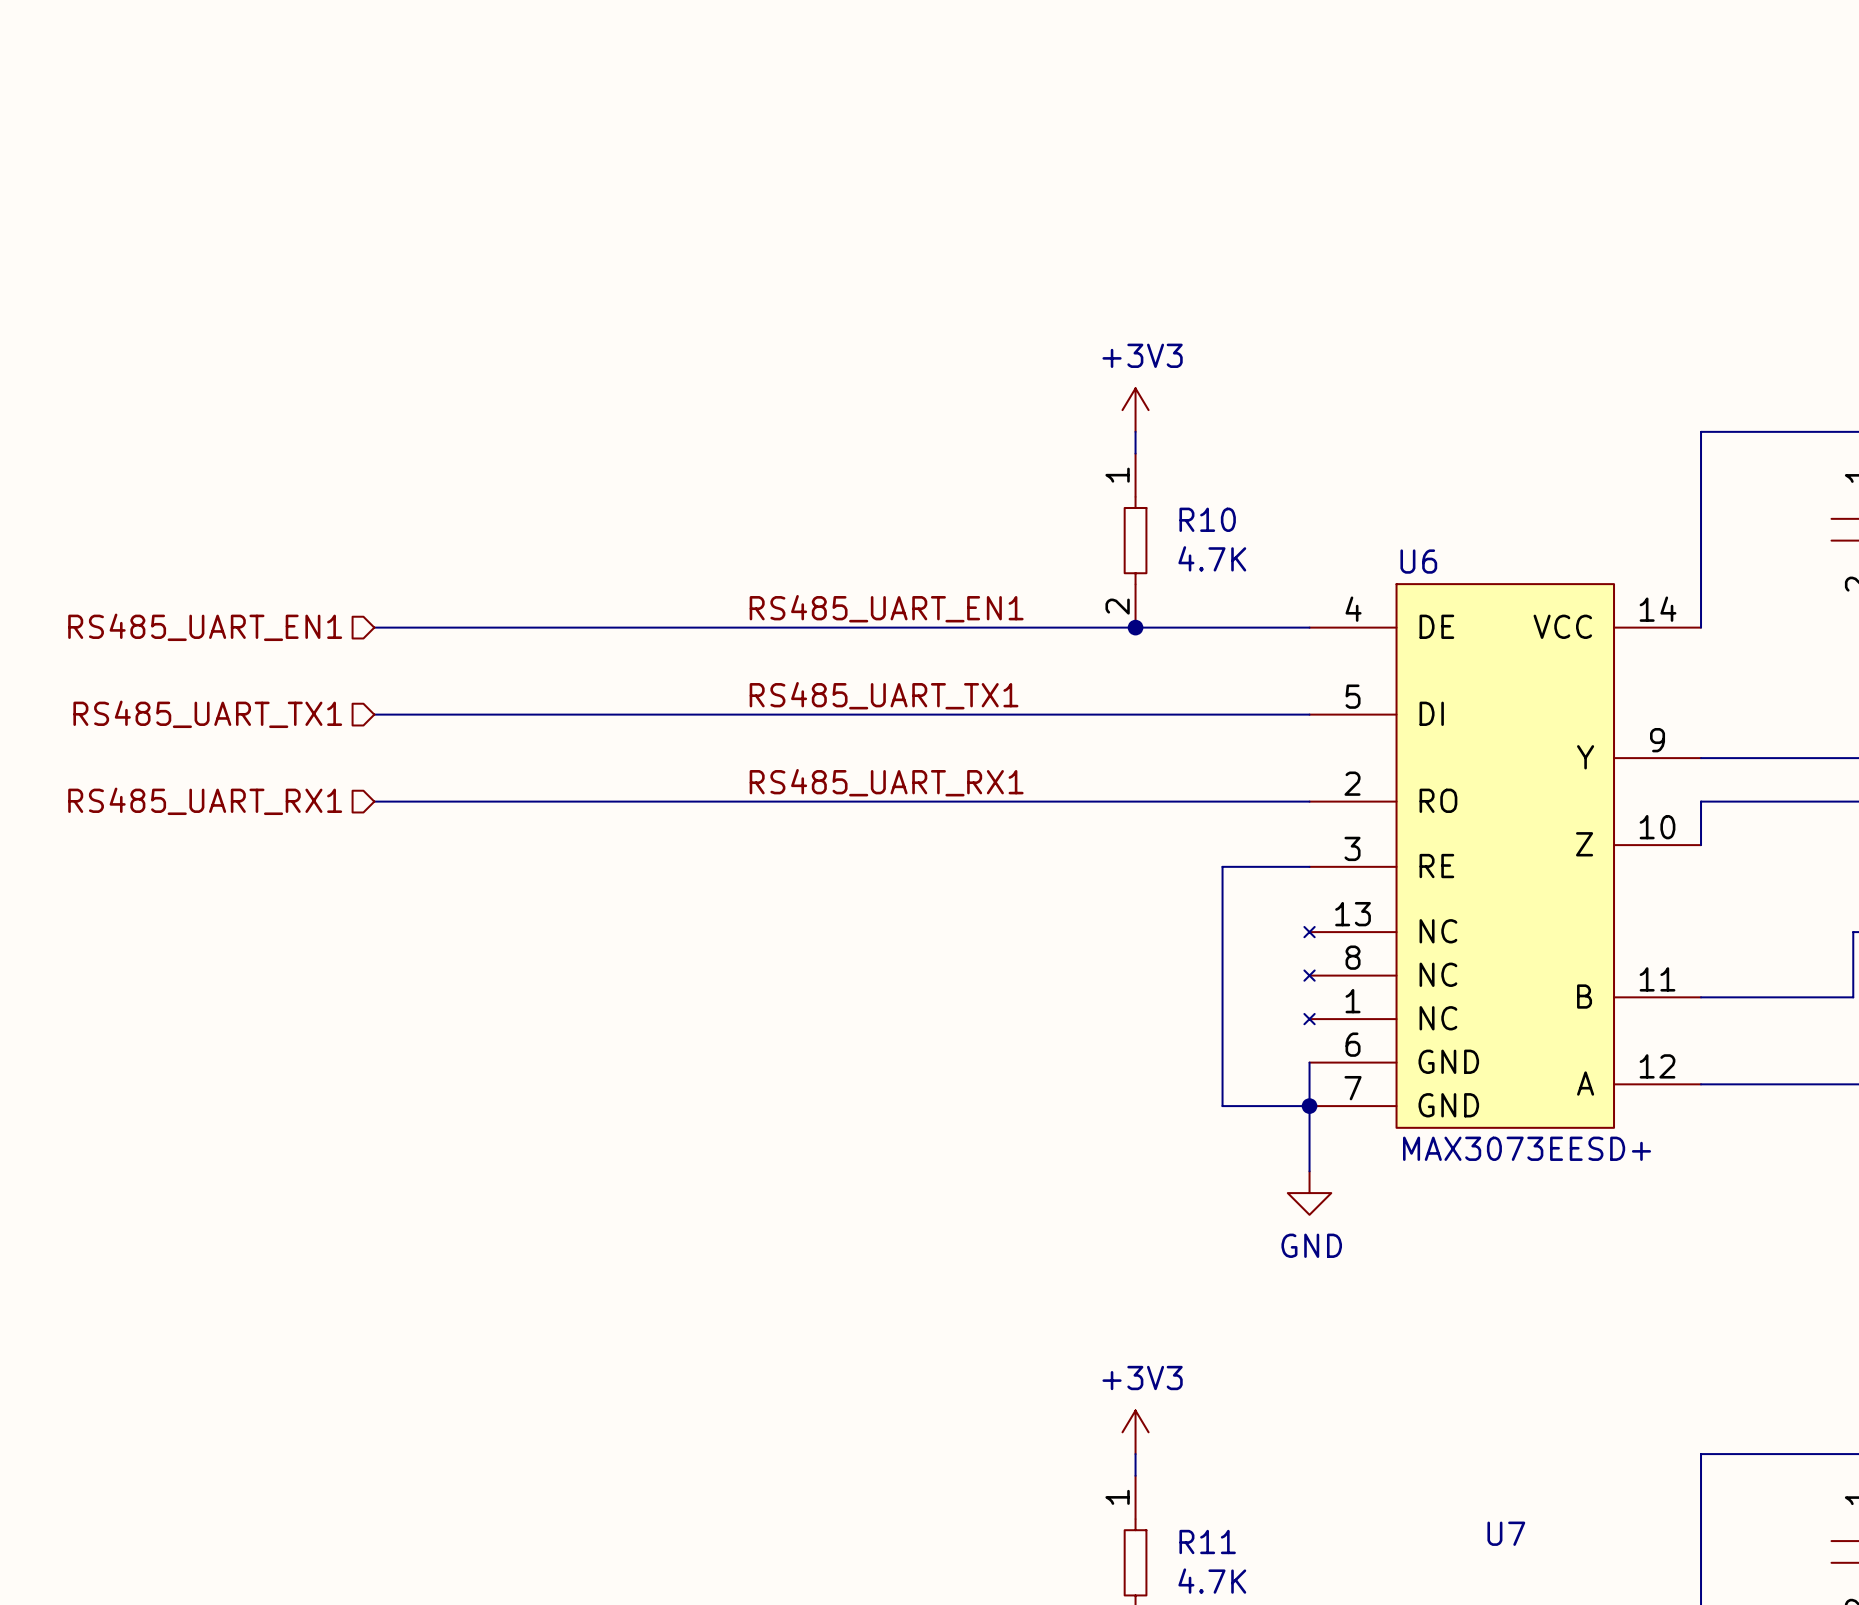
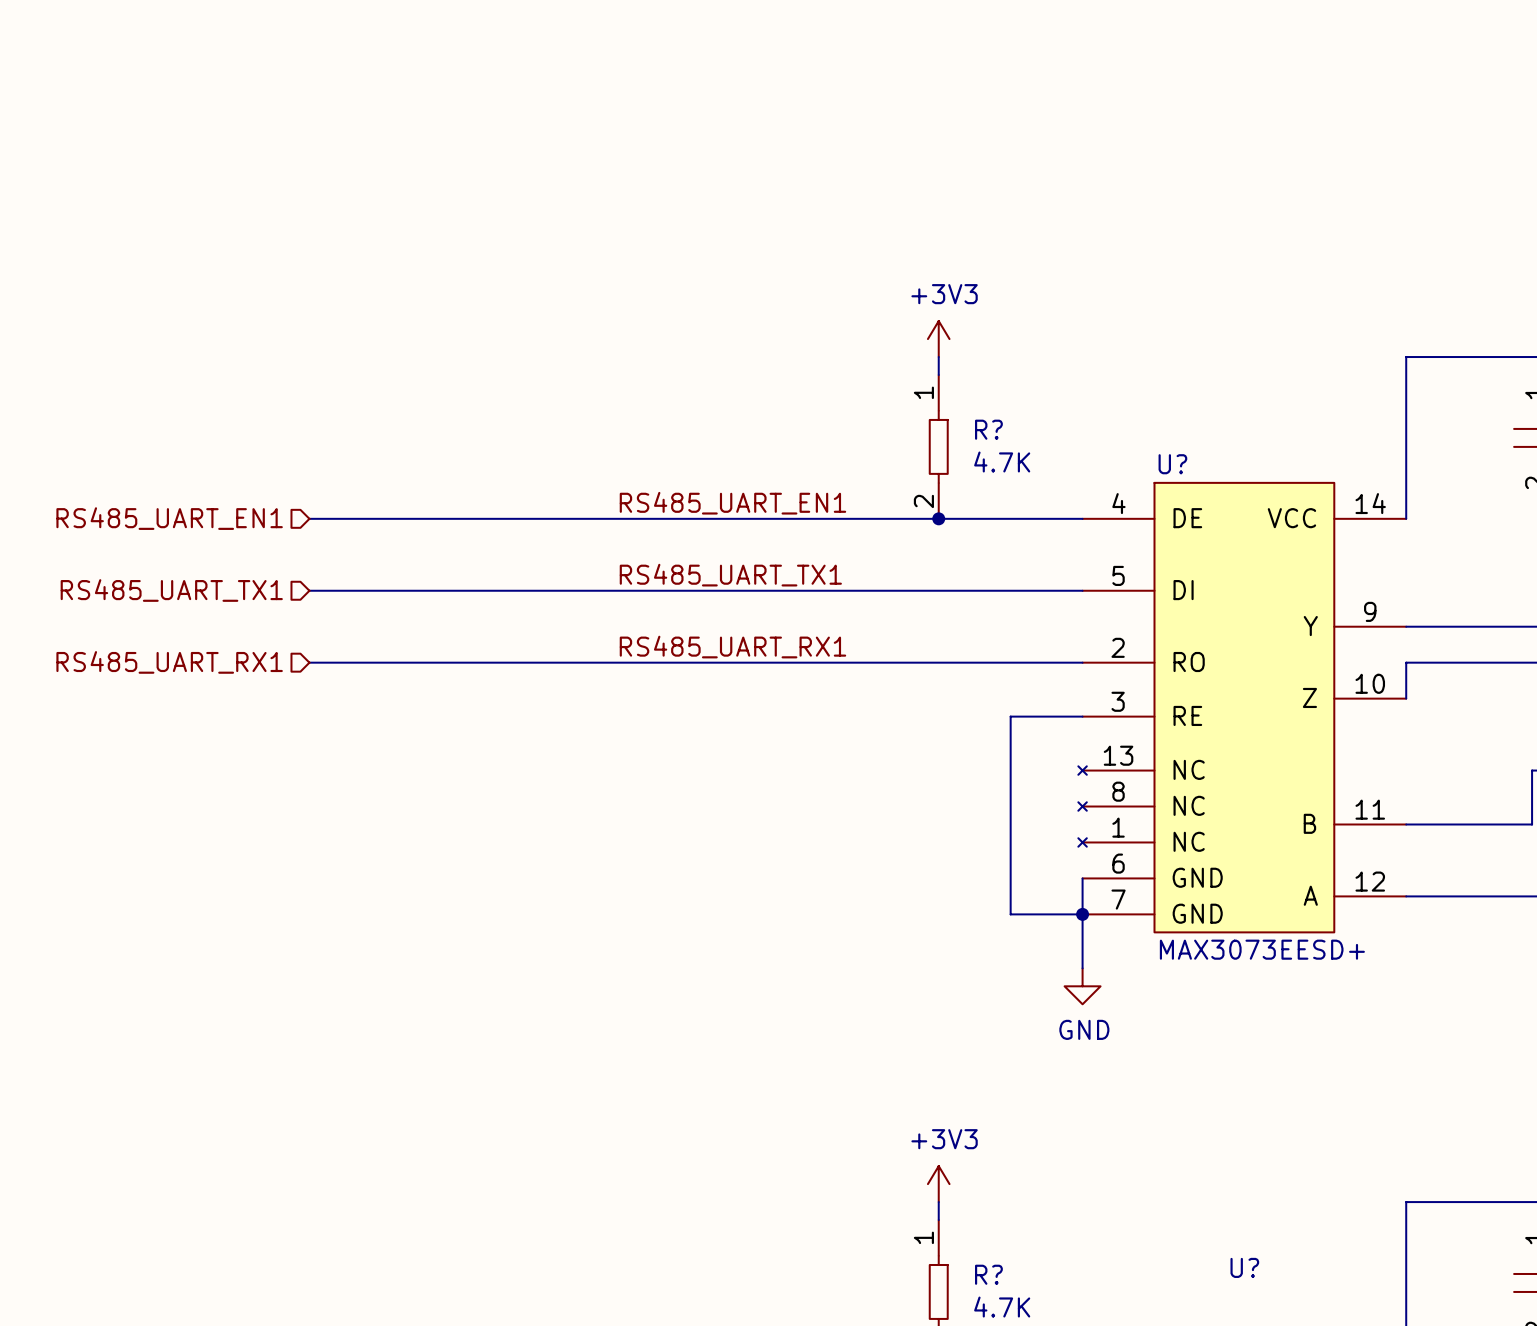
R10 name: R10 (1207, 519) -> R? (988, 429)
U6 name: U6 (1418, 561) -> U? (1172, 464)
U7 name: U7 (1506, 1533) -> U? (1244, 1267)
R11 name: R11 (1207, 1542) -> R? (988, 1274)

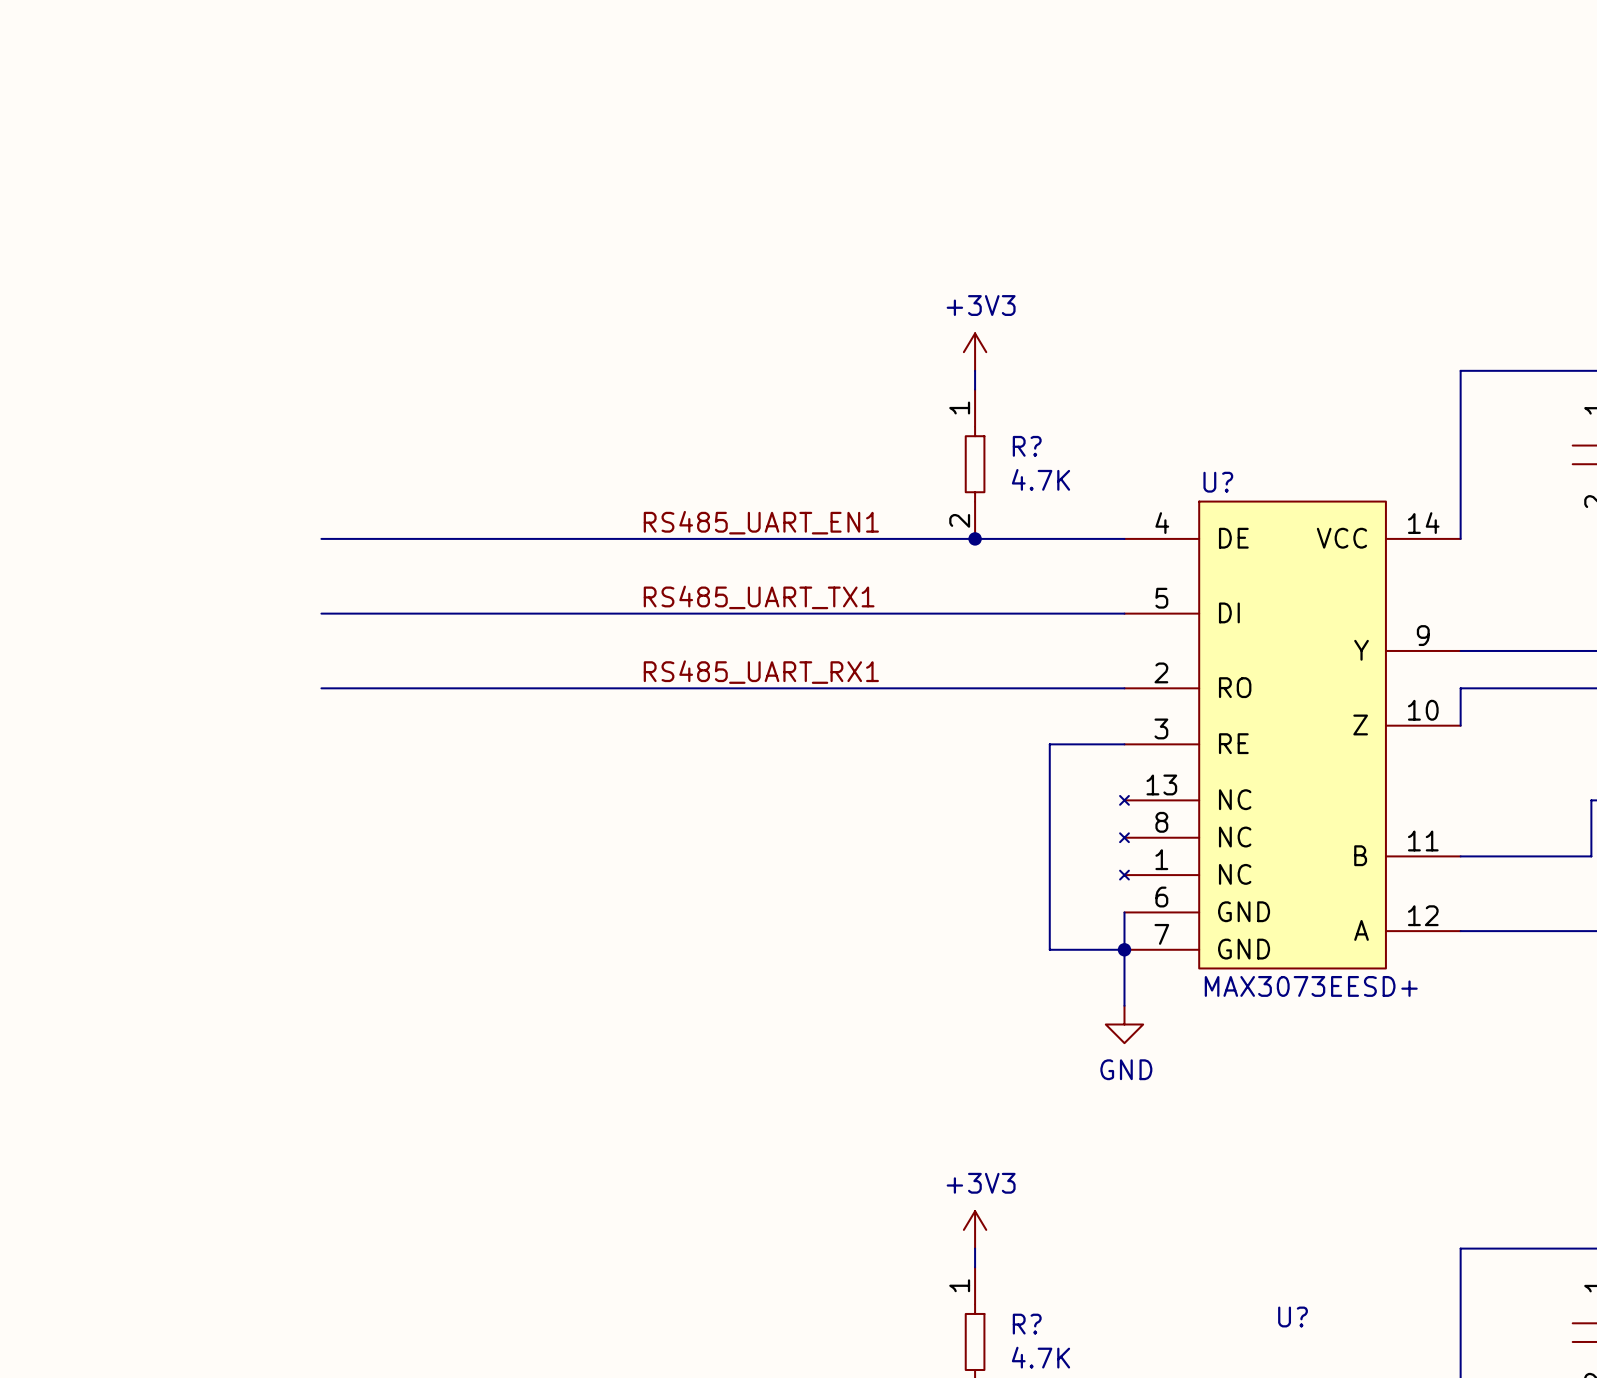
hierarchical label: RS485_UART_EN1 (169, 518) -> none
hierarchical label: RS485_UART_TX1 (171, 590) -> none
hierarchical label: RS485_UART_RX1 (169, 662) -> none

